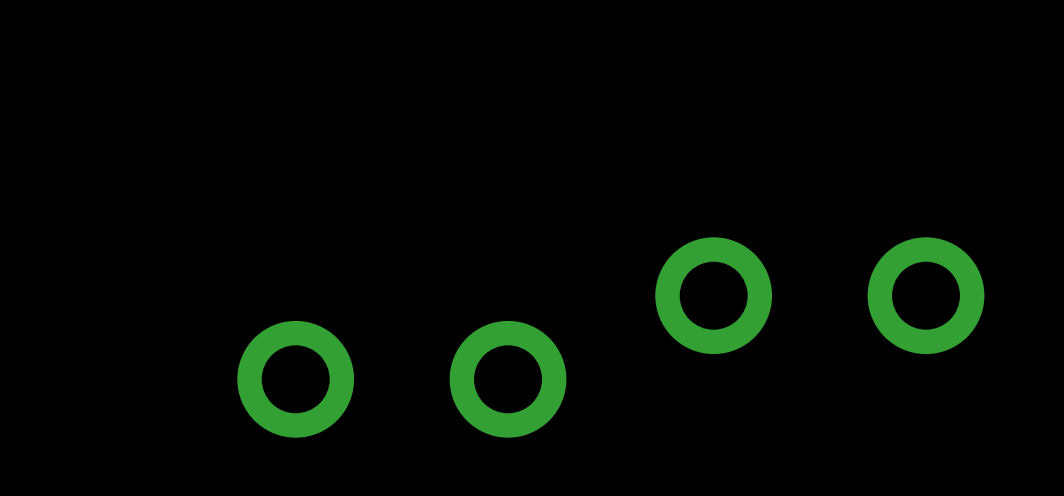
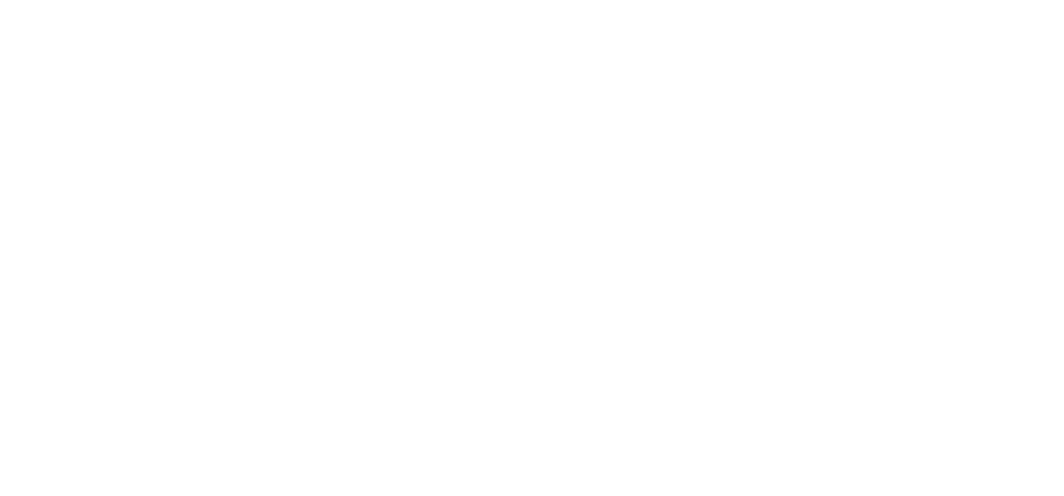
part: (819, 295) -> none
part: (401, 379) -> none

